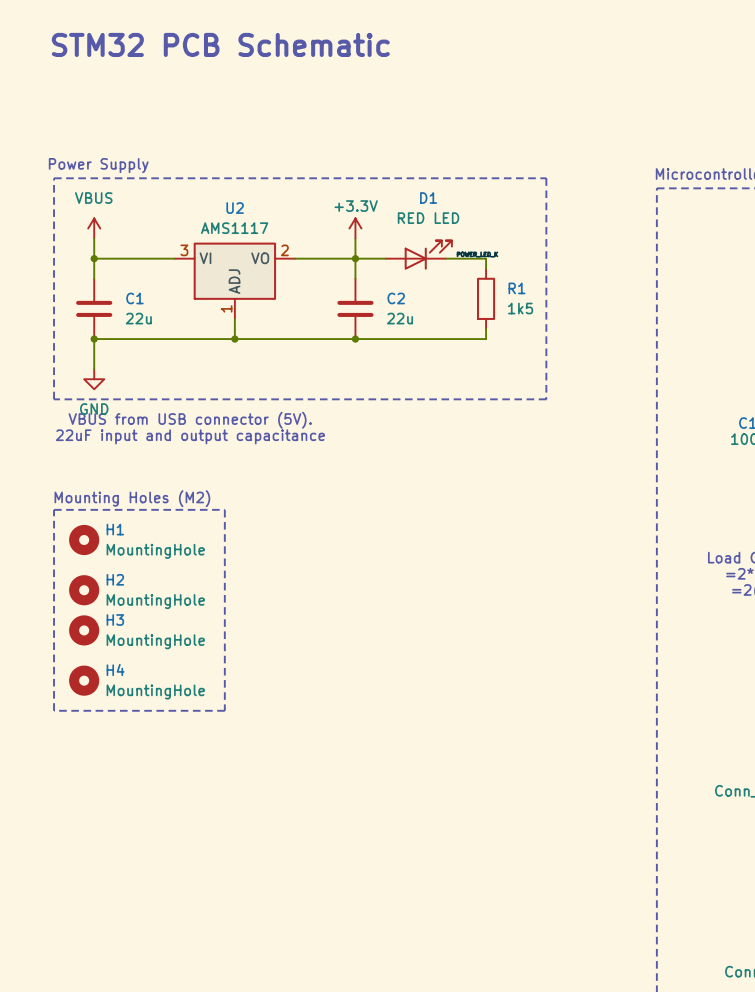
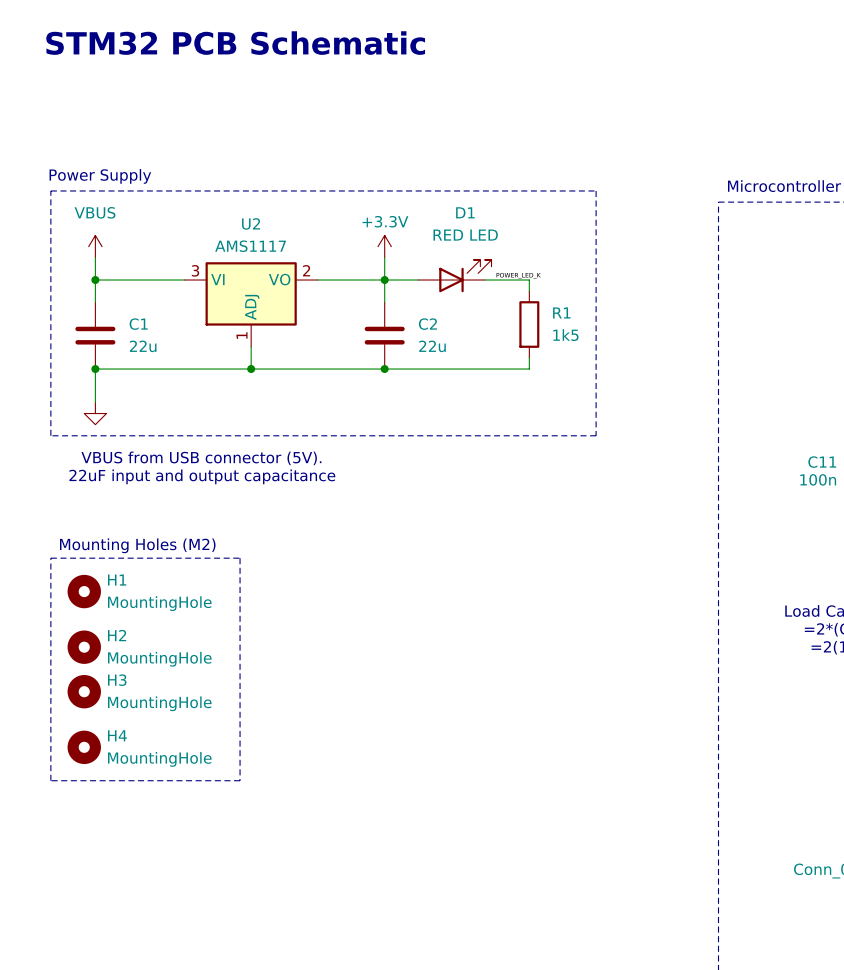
power symbol text: GND (94, 409) -> none

